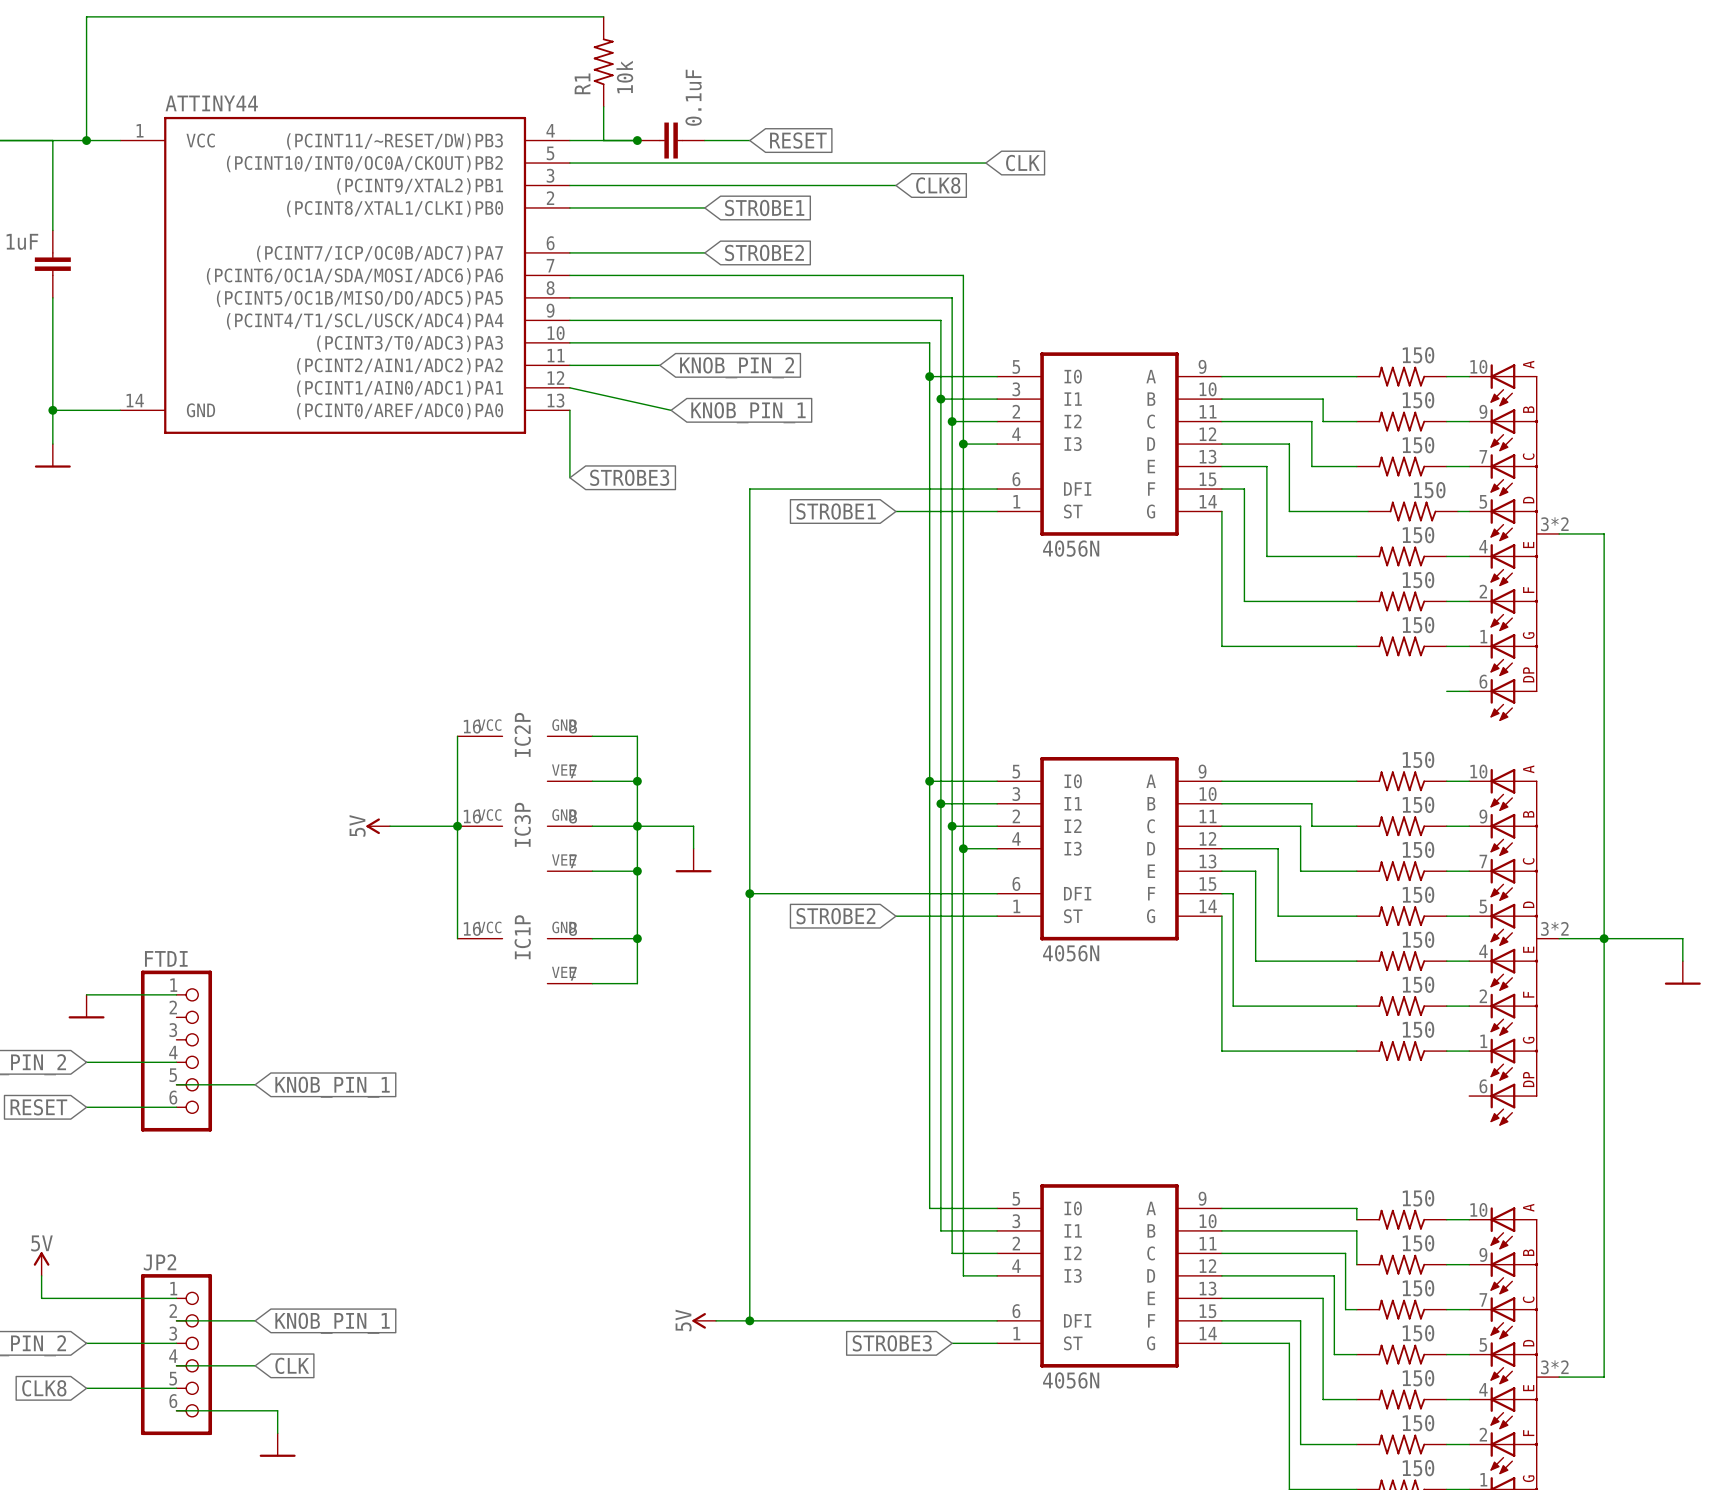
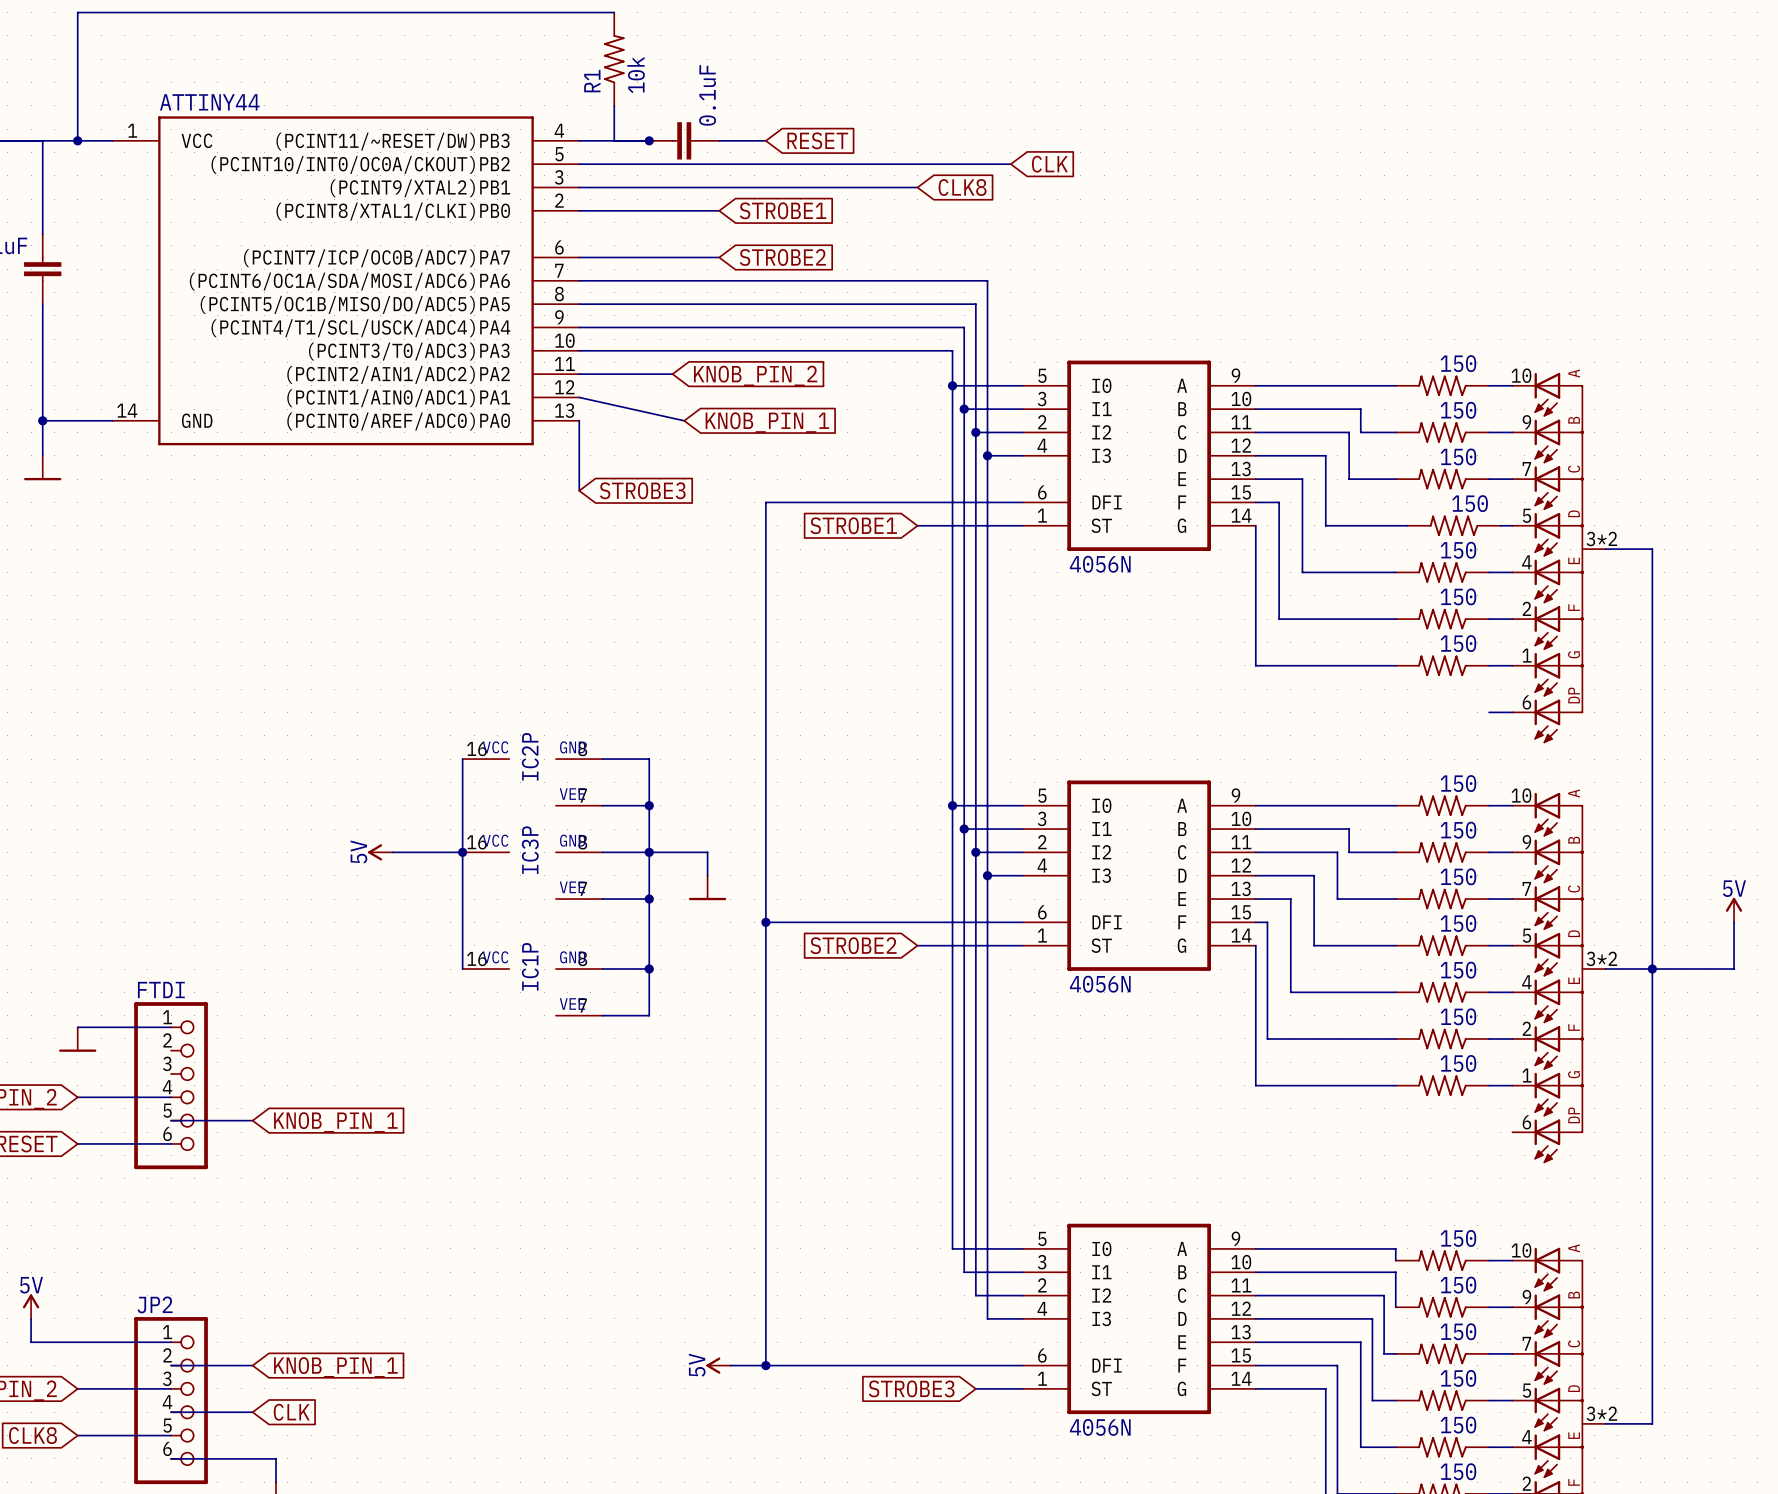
power symbol: none -> 5V (1734, 910)
wire: (1682, 938) (1682, 961) -> (1734, 969) (1734, 922)
power symbol: (1682, 972) -> none

